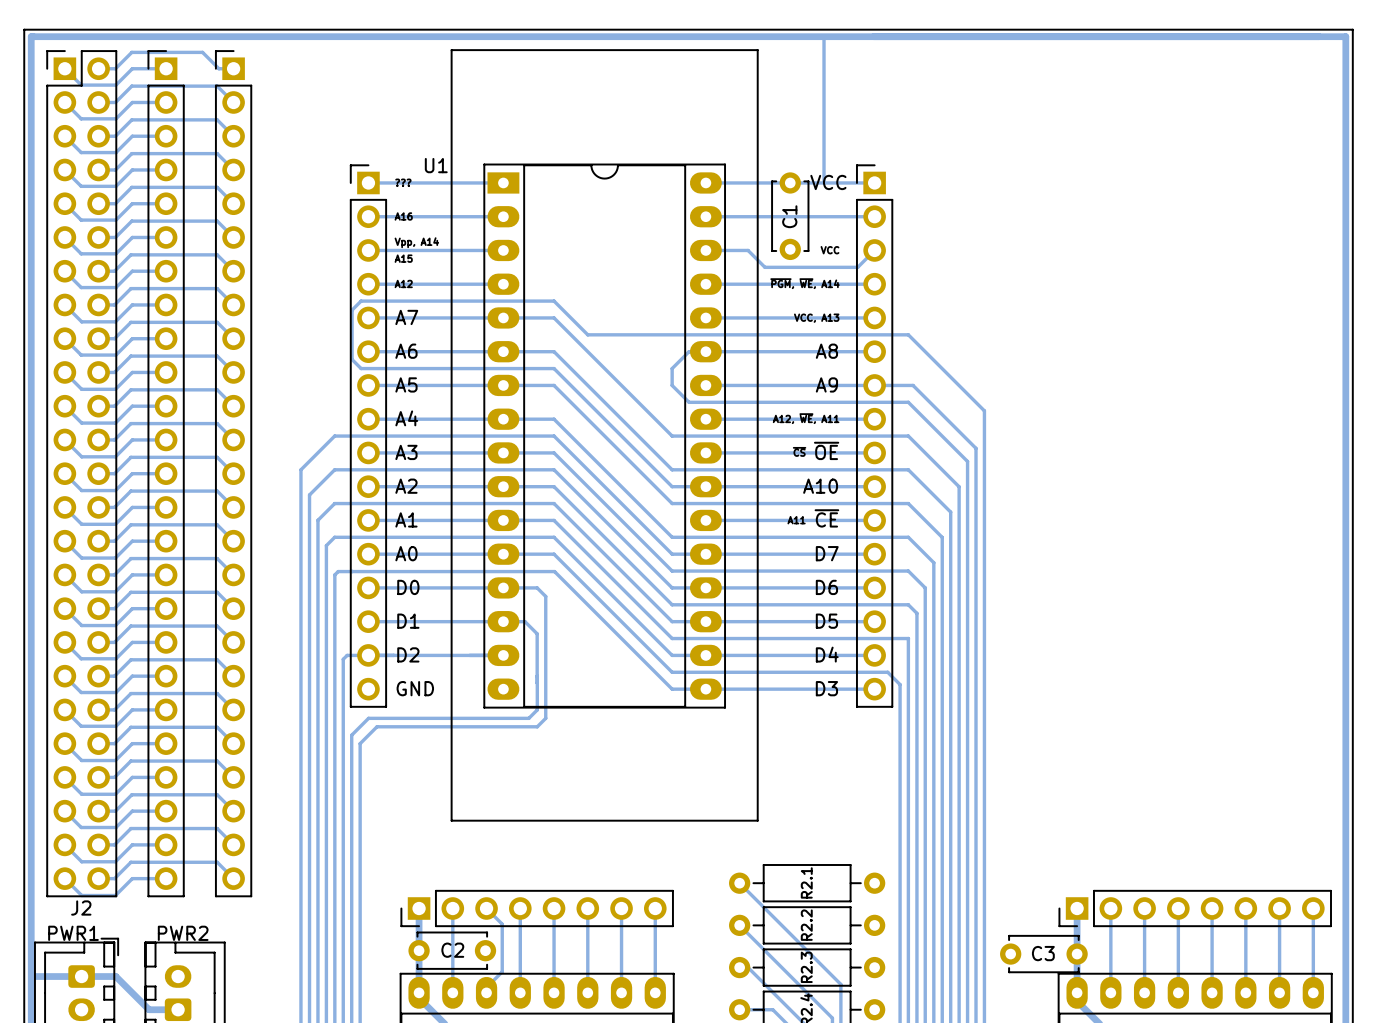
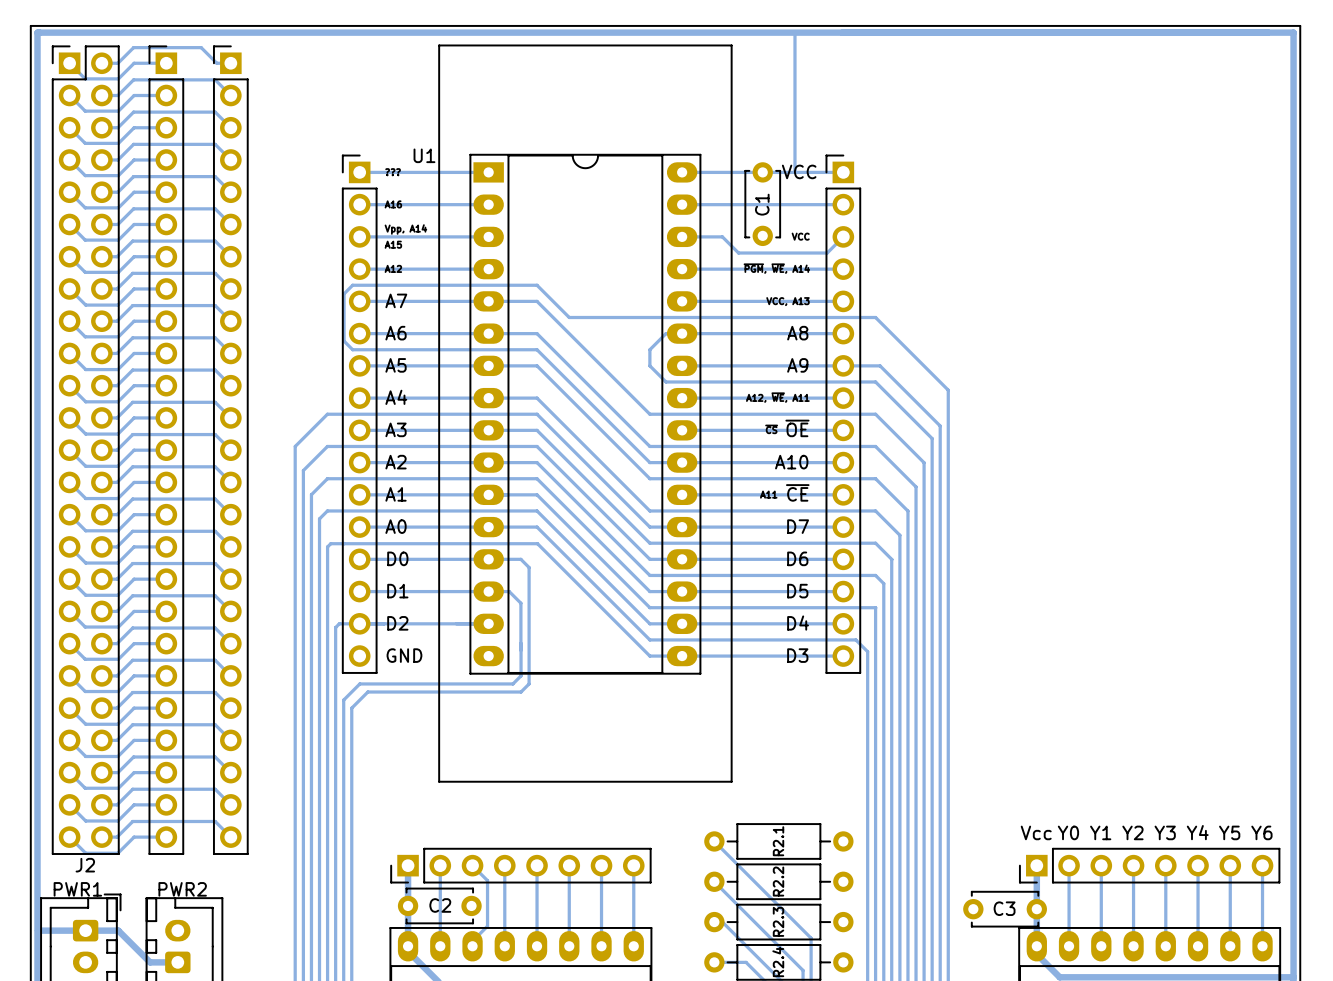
part text: none -> Y4 (1197, 832)
part text: none -> Vcc (1036, 832)
part text: none -> Y0 (1068, 832)
part text: none -> Y1 (1100, 832)
part text: none -> Y2 (1132, 832)
part text: none -> Y3 (1165, 832)
part text: none -> Y5 (1229, 832)
part text: none -> Y6 (1261, 832)

